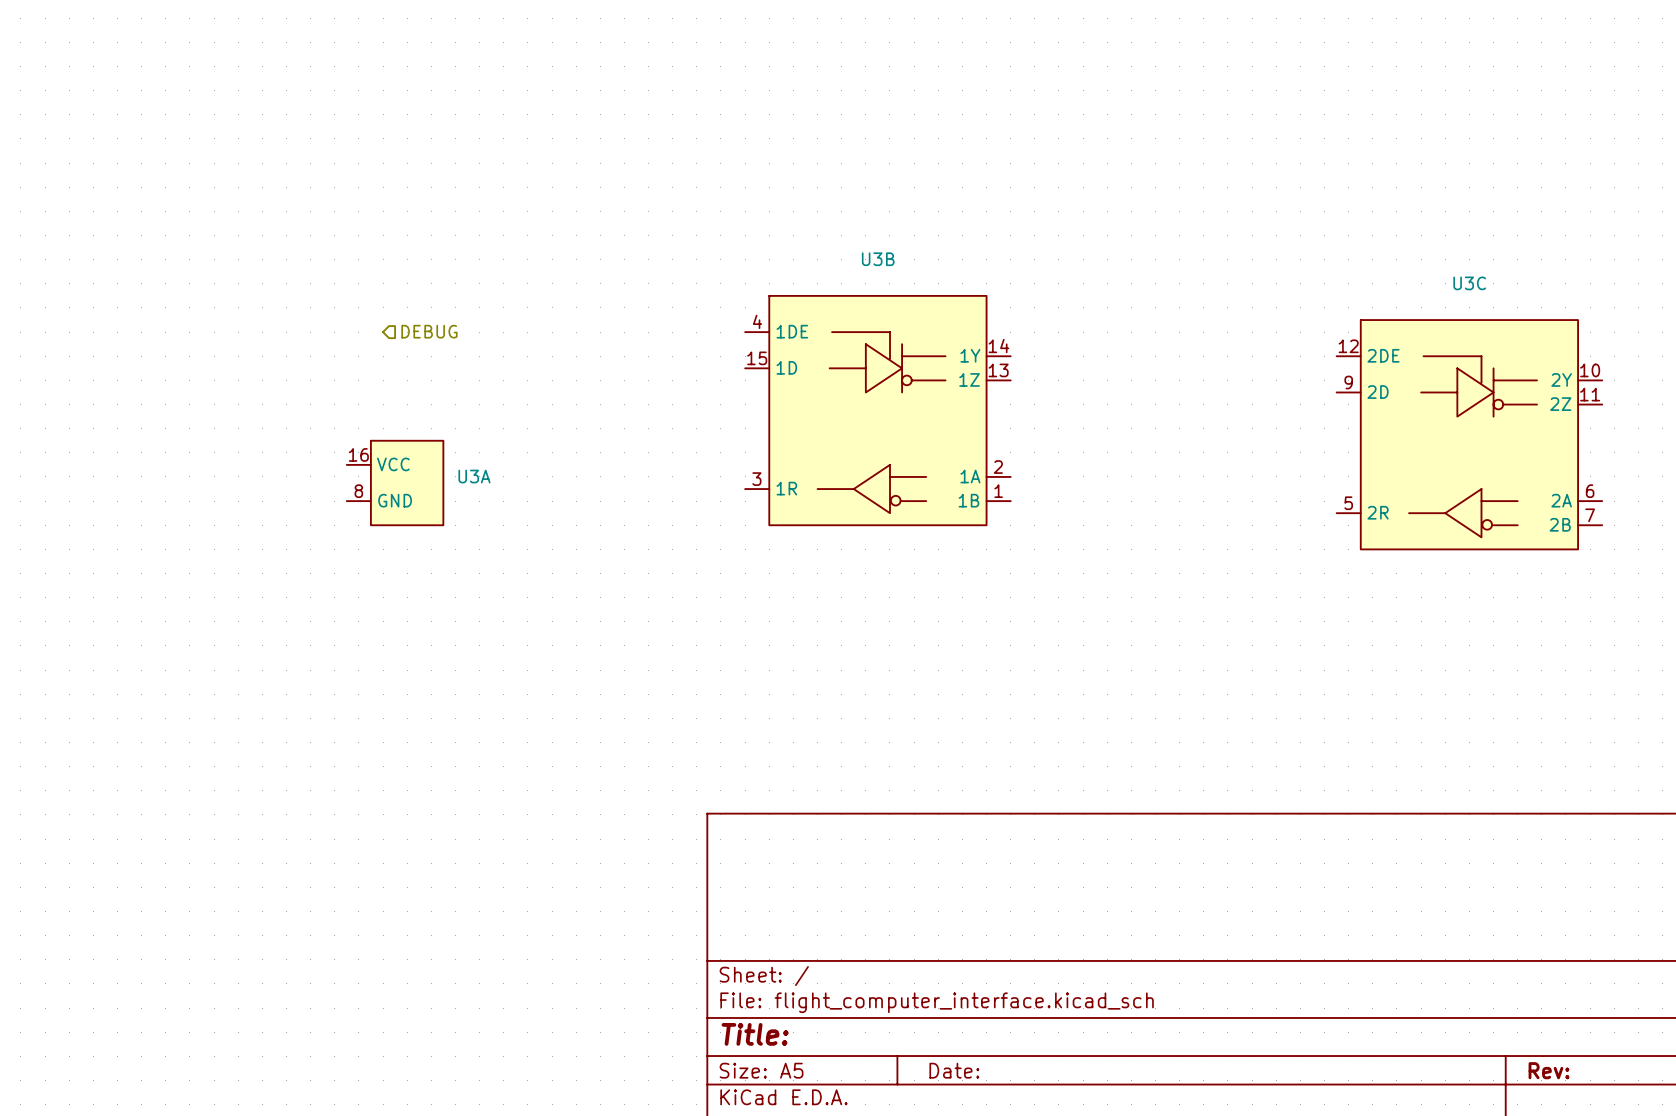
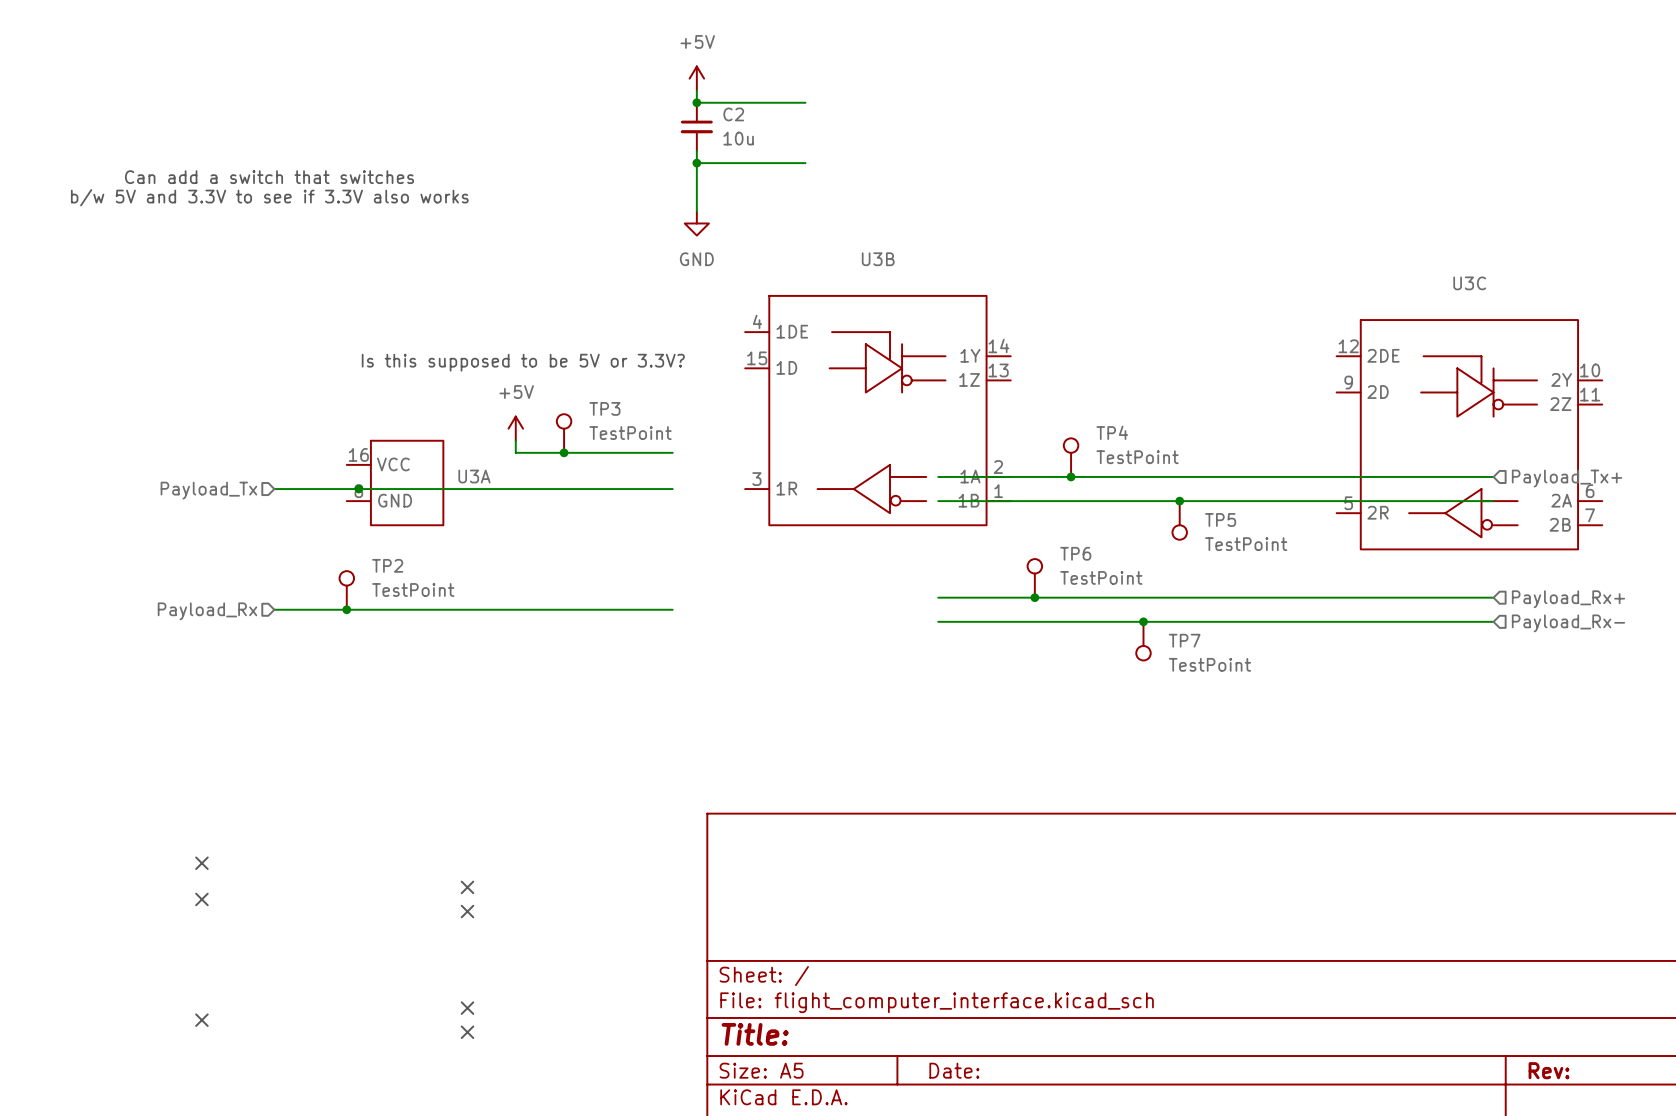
power symbol: none -> +5V (696, 78)
wire: none -> (696, 90) (696, 102) (805, 102)
junction: none -> (696, 102)
C2: none -> 10u (696, 126)
wire: none -> (696, 151) (696, 211)
wire: none -> (696, 163) (805, 163)
junction: none -> (696, 163)
text: none -> Can add a switch that switches (269, 177)
text: none -> b/w 5V and 3.3V to see if 3.3V also works (269, 197)
power symbol: none -> GND (696, 223)
hierarchical label: DEBUG (429, 331) -> none
text: none -> Is this supposed to be 5V or 3.3V? (523, 362)
power symbol: none -> +5V (515, 428)
TP3: none -> TestPoint (564, 433)
wire: none -> (515, 440) (515, 452) (672, 452)
junction: none -> (564, 452)
TP4: none -> TestPoint (1071, 457)
wire: none -> (938, 476) (1493, 476)
junction: none -> (1071, 476)
hierarchical label: none -> Payload_Tx+ (1567, 478)
wire: none -> (274, 489) (672, 489)
junction: none -> (358, 489)
hierarchical label: none -> Payload_Tx (208, 490)
wire: none -> (938, 501) (1493, 501)
junction: none -> (1179, 501)
TP5: none -> TestPoint (1179, 520)
TP6: none -> TestPoint (1034, 578)
TP2: none -> TestPoint (346, 590)
wire: none -> (938, 597) (1493, 597)
junction: none -> (1034, 597)
hierarchical label: none -> Payload_Rx+ (1568, 599)
wire: none -> (274, 609) (672, 609)
junction: none -> (346, 609)
hierarchical label: none -> Payload_Rx (207, 611)
wire: none -> (938, 621) (1493, 621)
junction: none -> (1143, 621)
hierarchical label: none -> Payload_Rx- (1568, 623)
TP7: none -> TestPoint (1143, 641)
no-connect mark: none -> (201, 863)
no-connect mark: none -> (467, 887)
no-connect mark: none -> (201, 899)
no-connect mark: none -> (467, 911)
no-connect mark: none -> (467, 1008)
no-connect mark: none -> (201, 1020)
no-connect mark: none -> (467, 1032)

